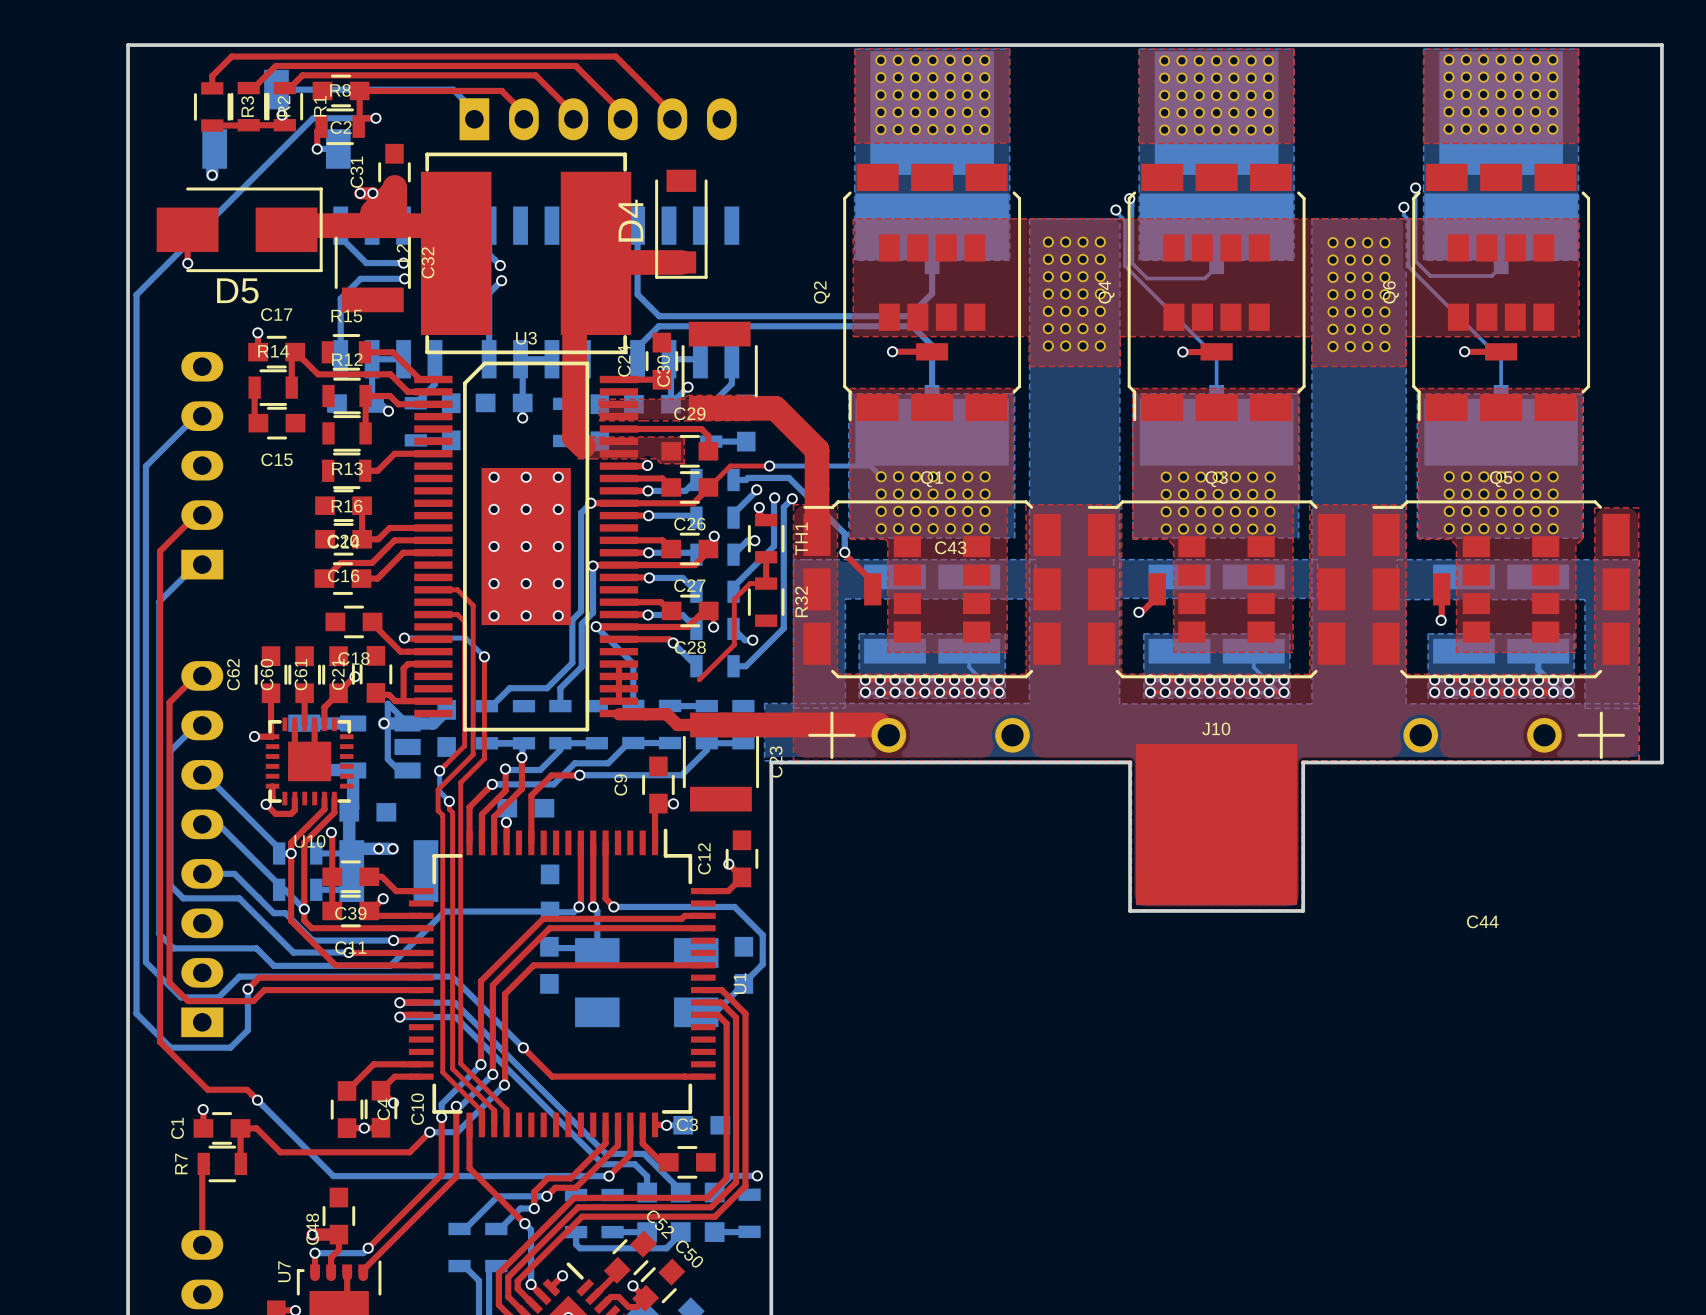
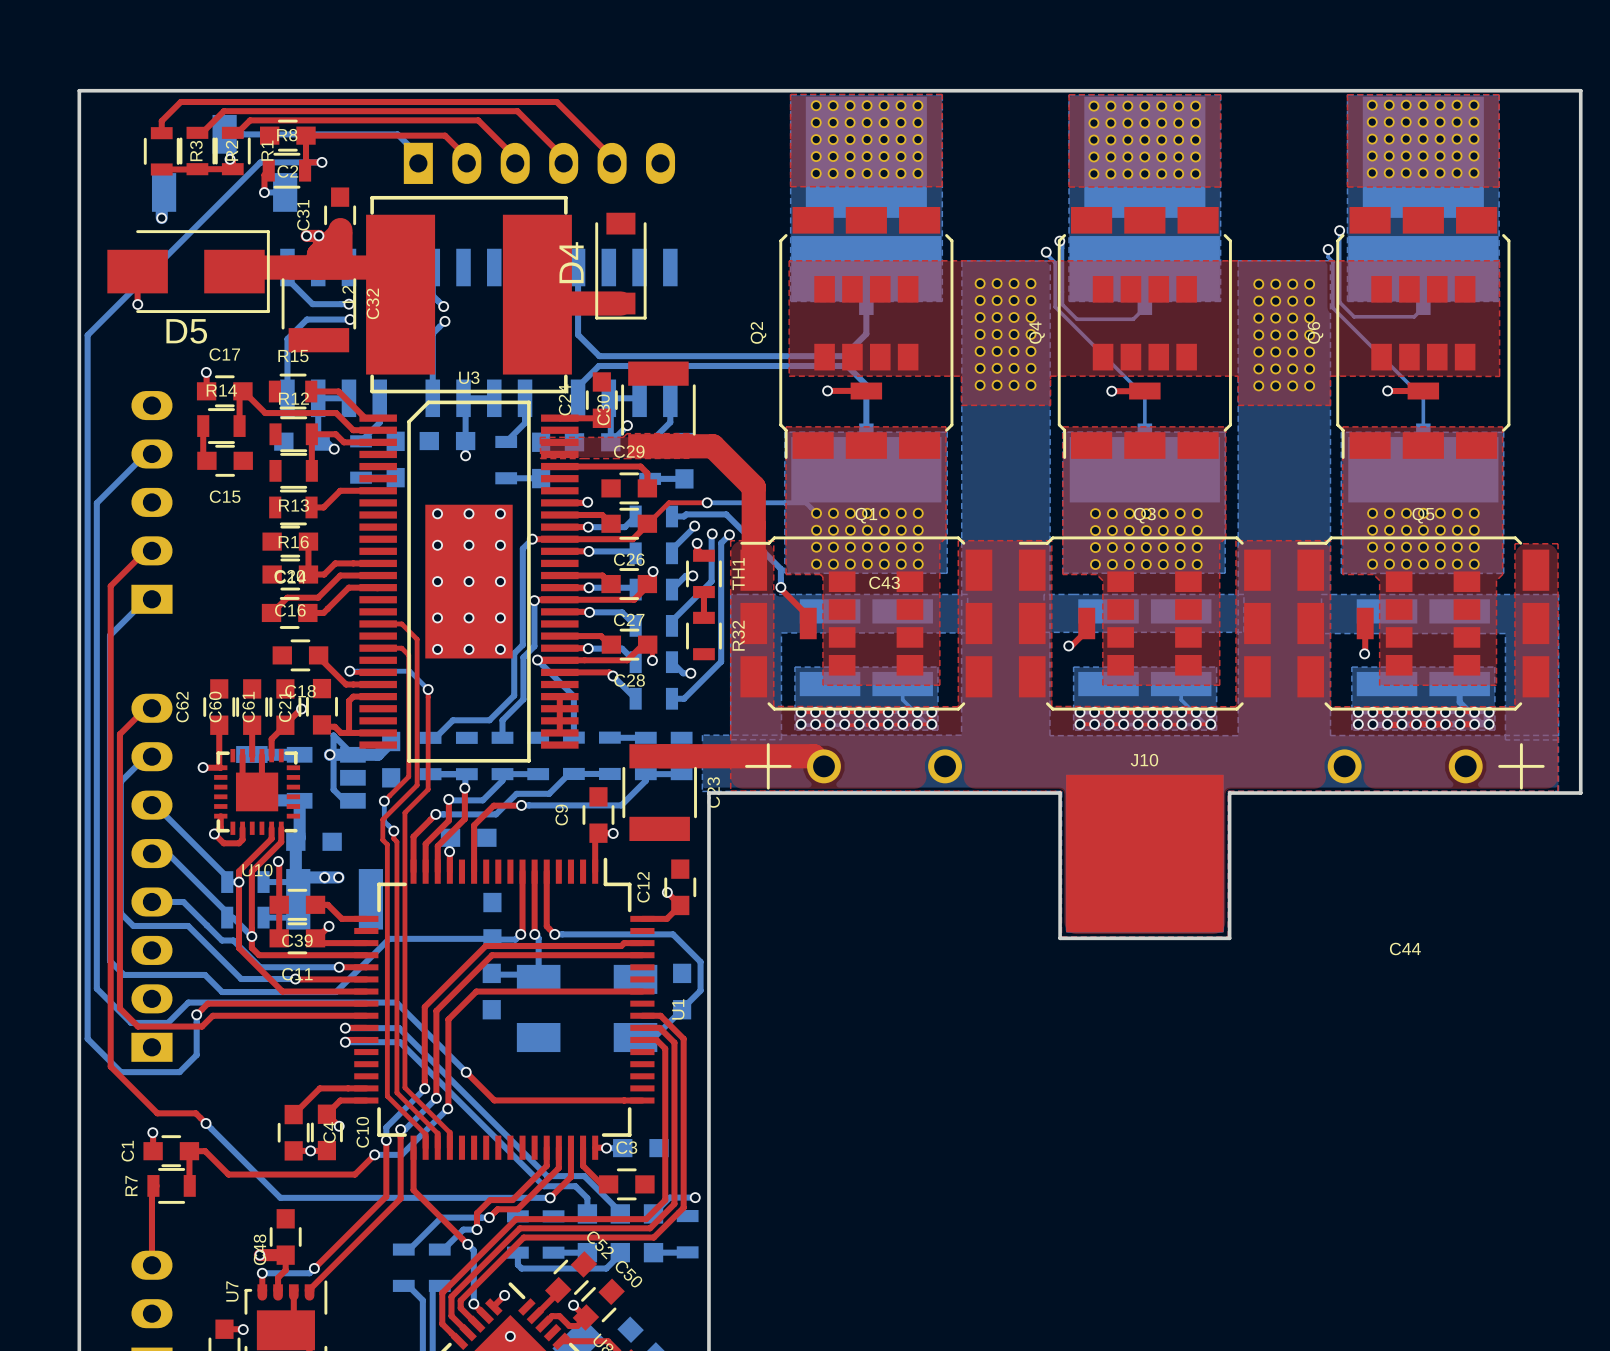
top track: (596, 253) (596, 299) (574, 321) (574, 437) (583, 446) -> none
top zone outline: (589, 436) (583, 444) (577, 458) (656, 458) (661, 463) (684, 463) (684, 436) (589, 436) -> none
top track: (766, 583) (750, 583) (734, 599) (734, 644) (699, 679) -> none
top track: (618, 714) (666, 714) (677, 724) (720, 724) -> none

